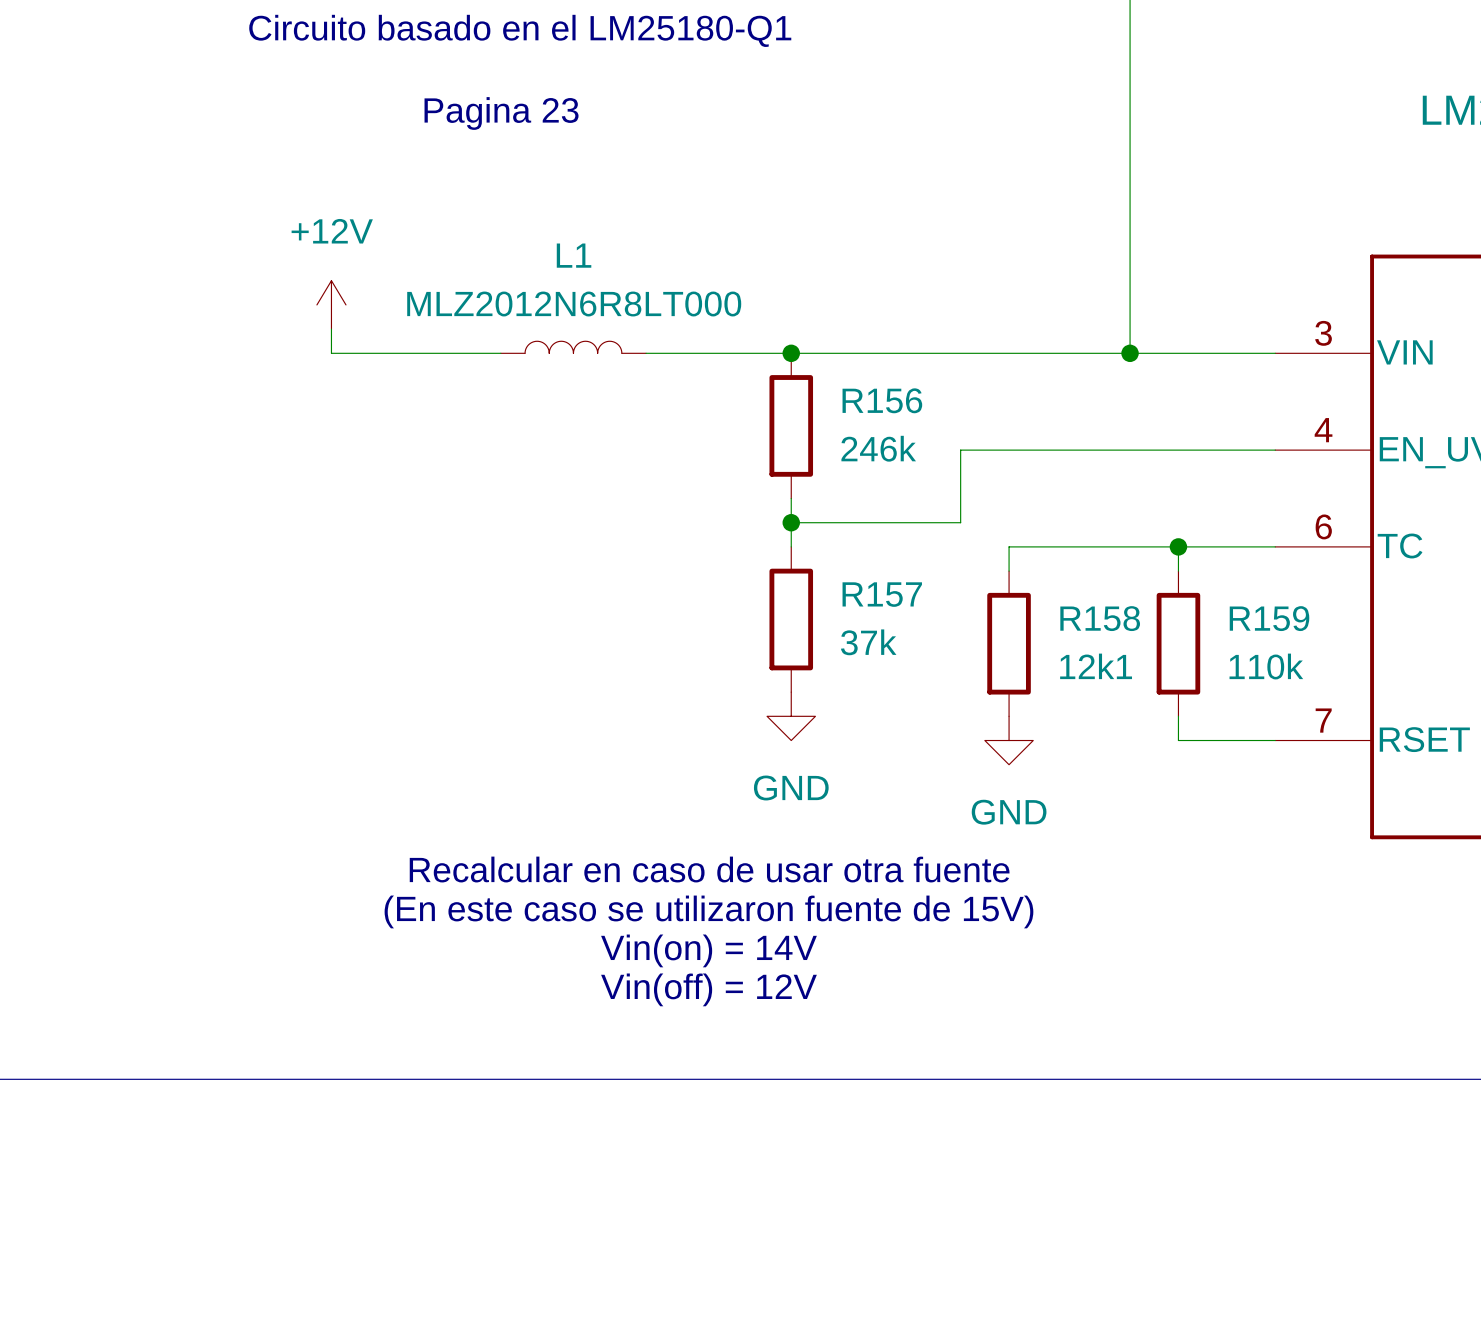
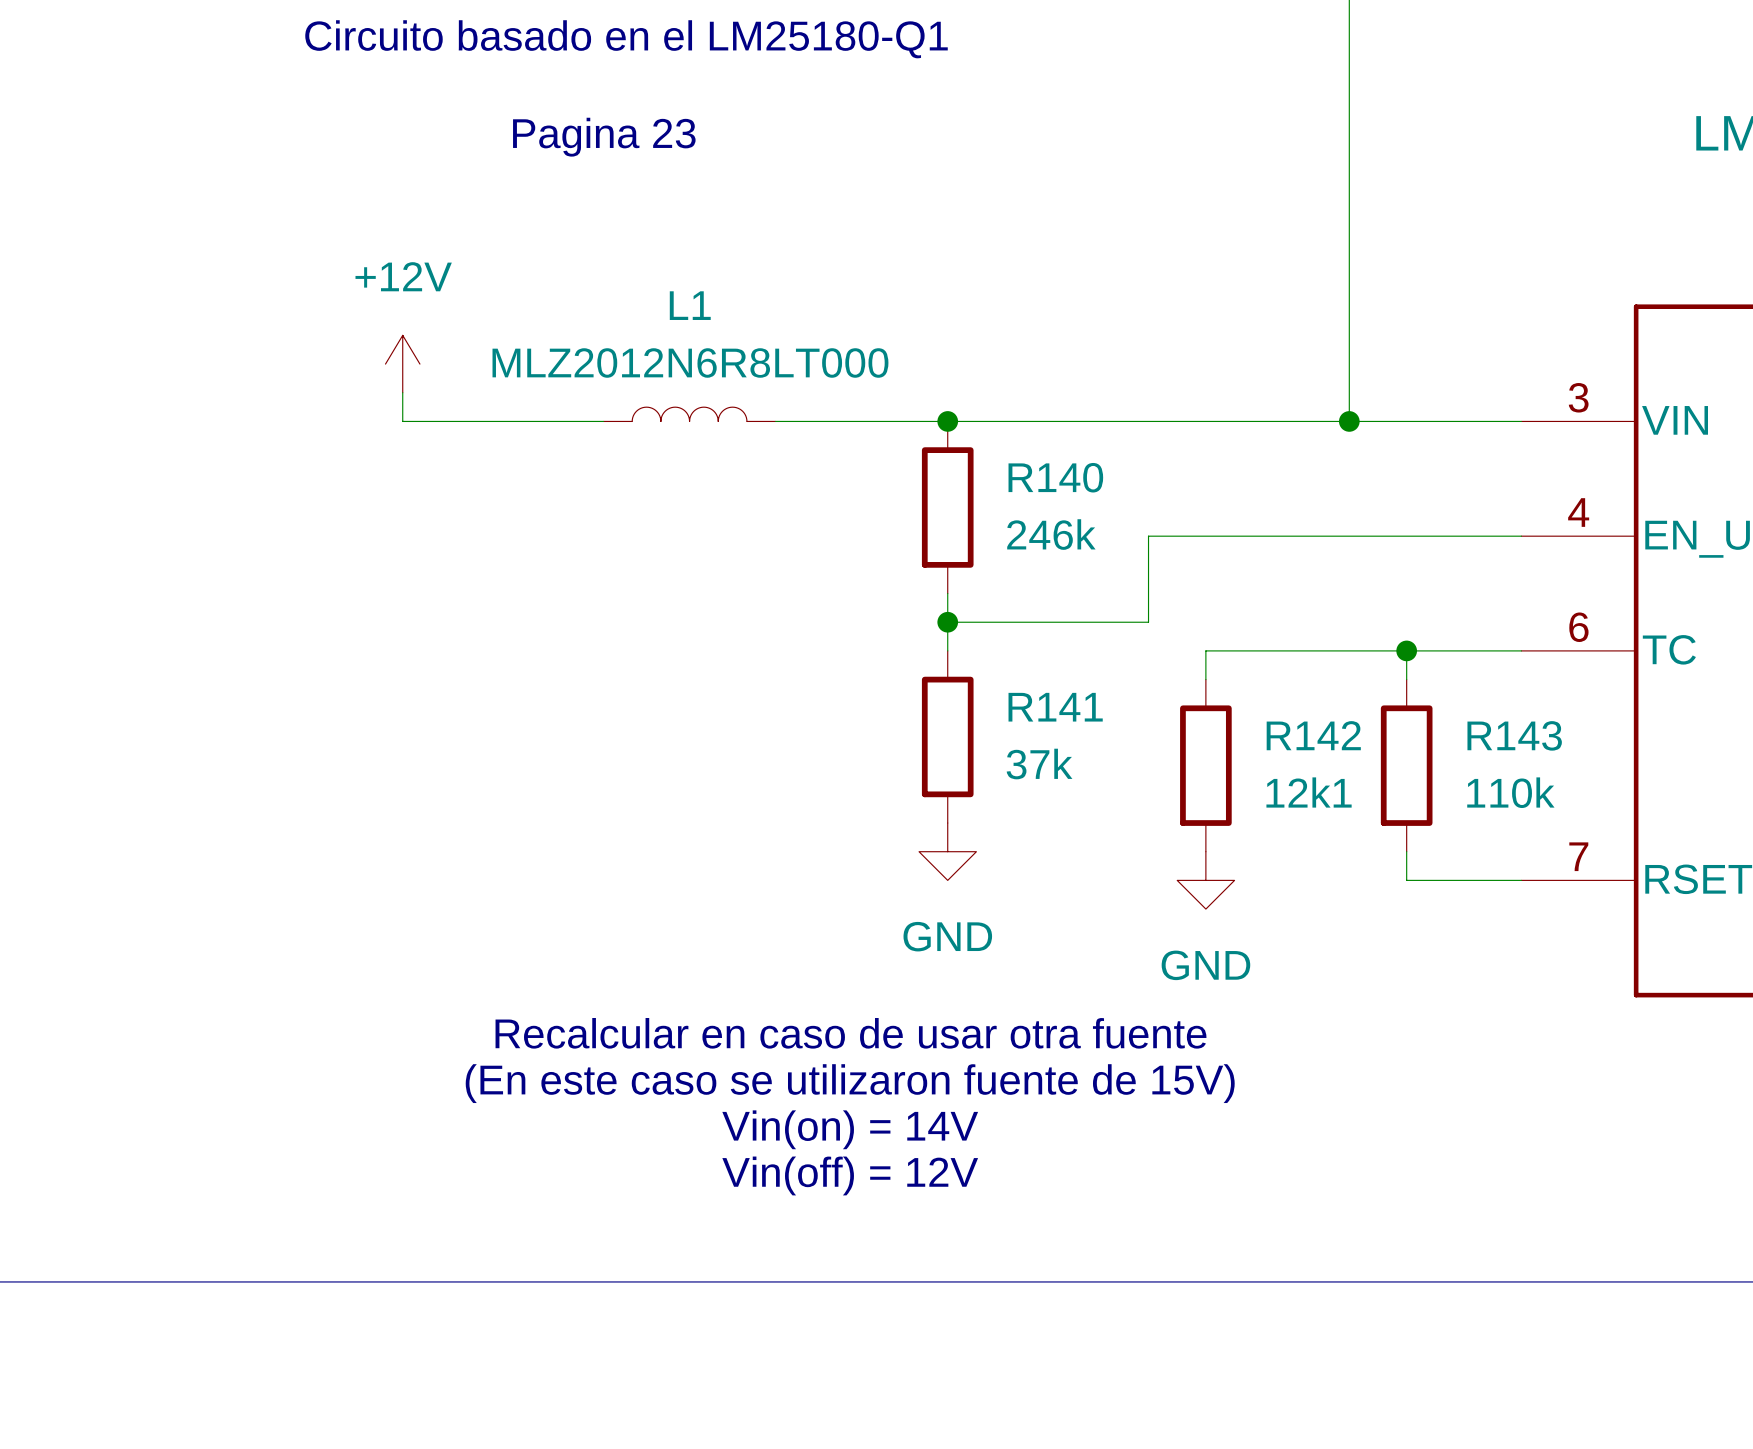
R156 name: R156 (882, 400) -> R140 (1055, 477)
R157 name: R157 (882, 594) -> R141 (1055, 707)
R158 name: R158 (1100, 618) -> R142 (1313, 735)
R159 name: R159 (1269, 618) -> R143 (1514, 735)

